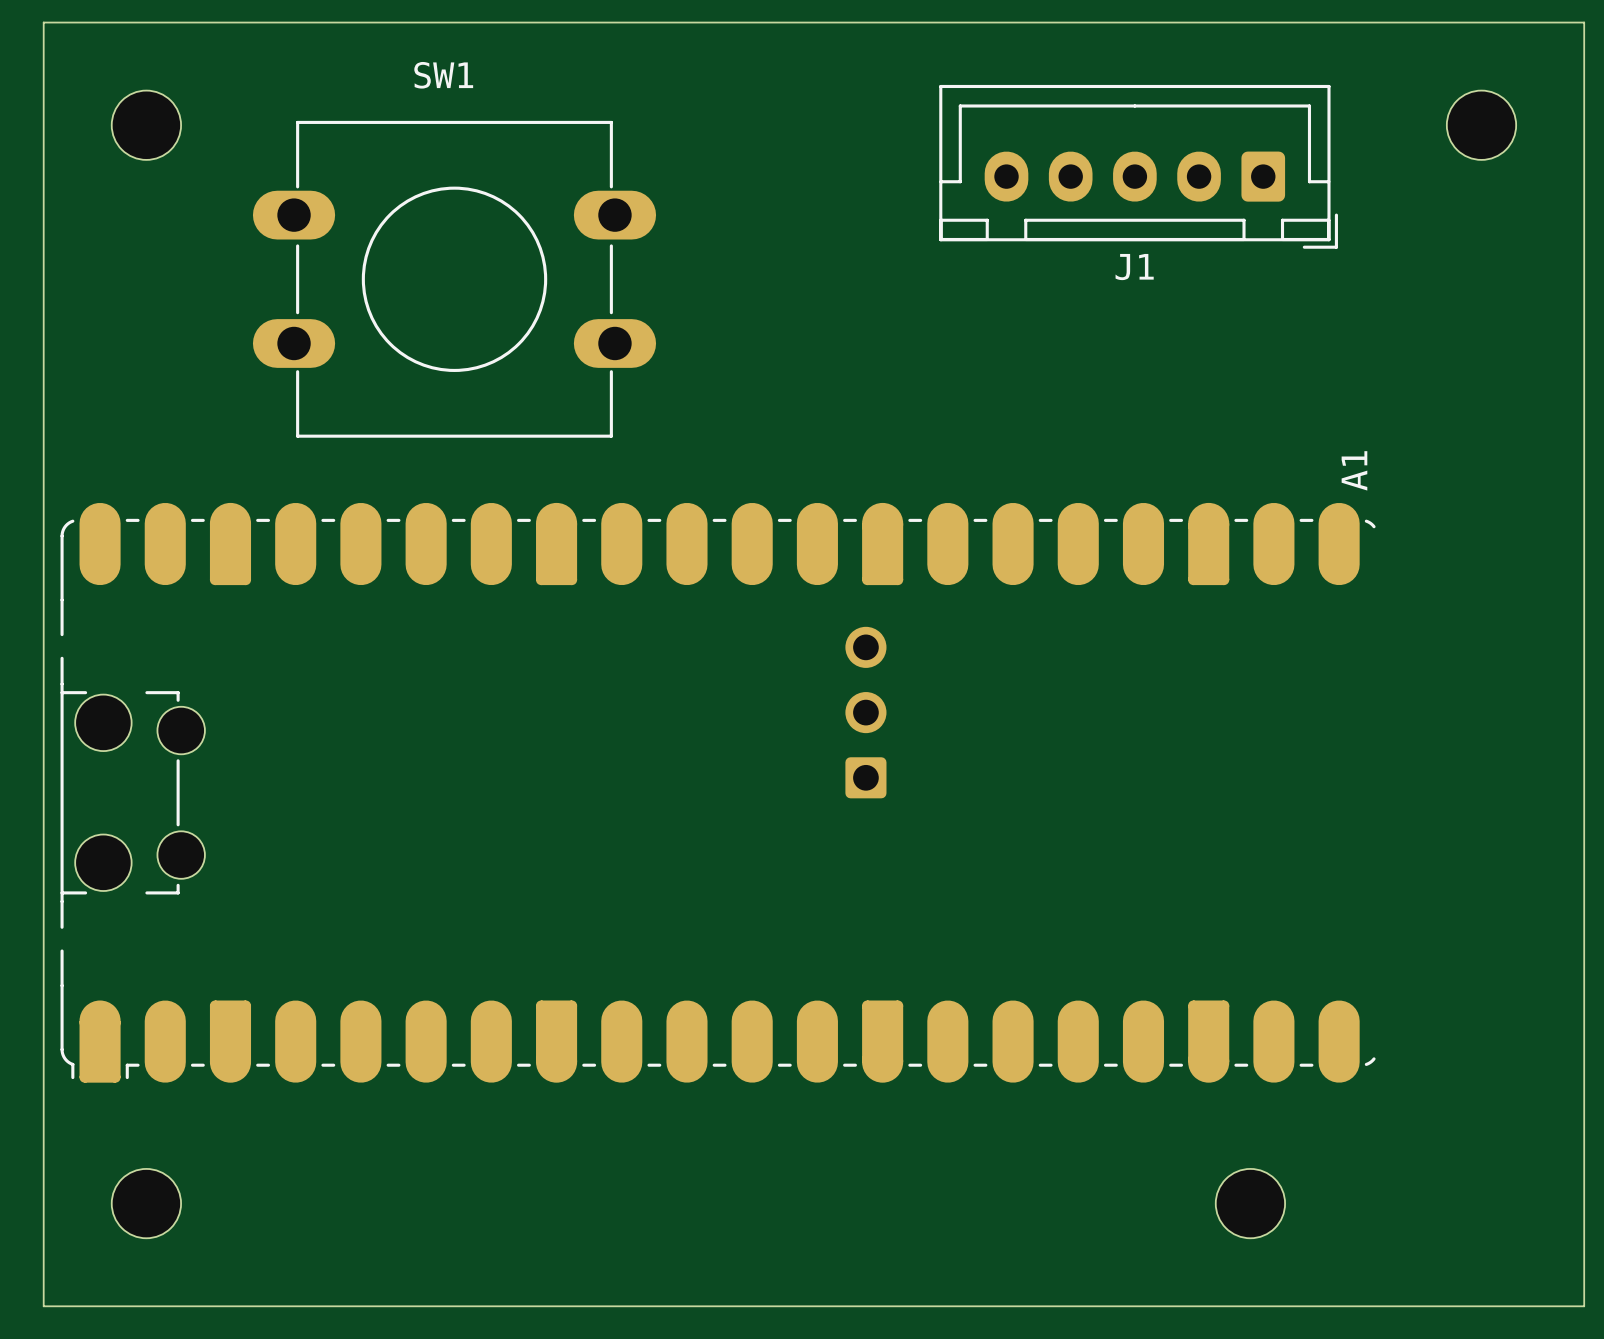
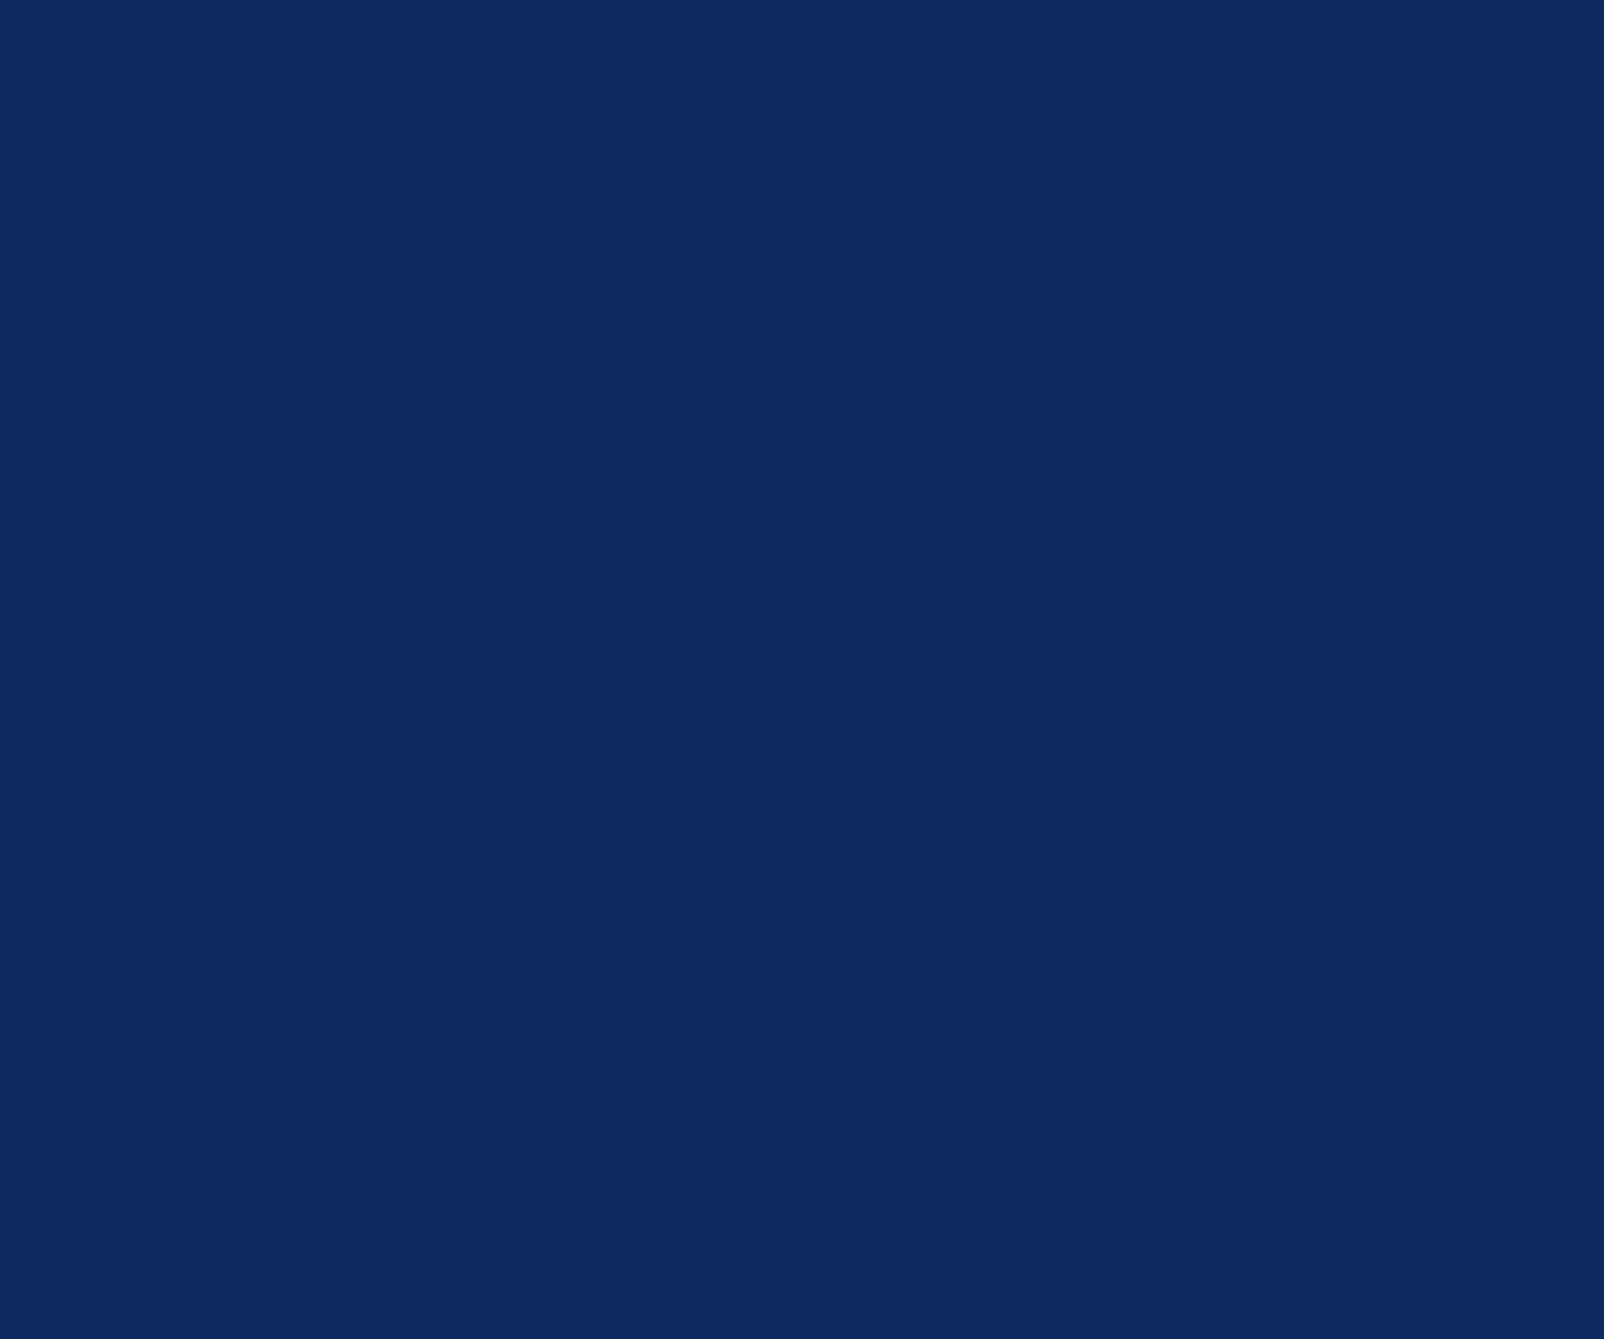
board edge: (43, 22) (1584, 22) (1584, 1306) (43, 1306) (43, 22) -> none
part: (146, 125) -> none
part: (1481, 125) -> none
J1: (1138, 166) -> none
SW1: (454, 279) -> none
A1: (718, 792) -> none
part: (146, 1203) -> none
part: (1250, 1203) -> none

